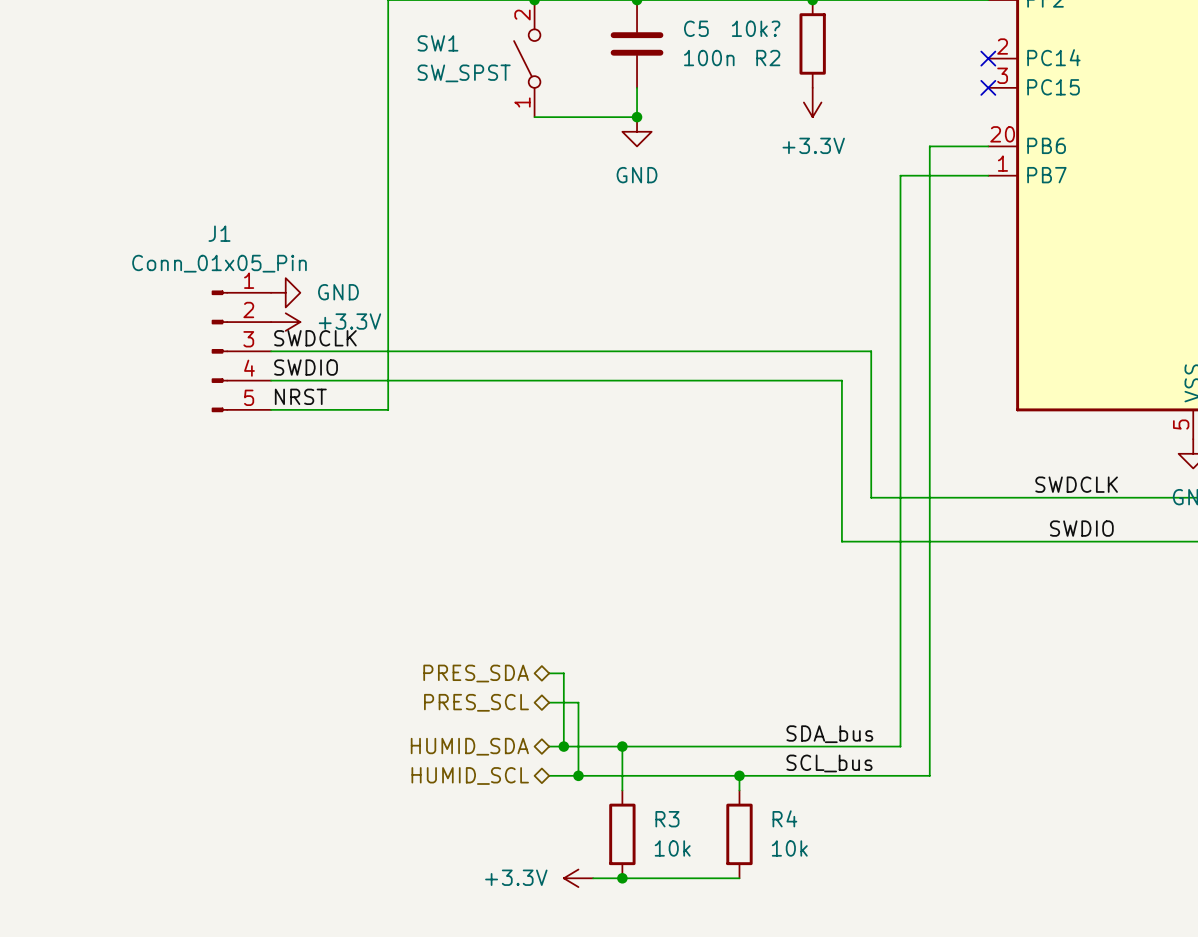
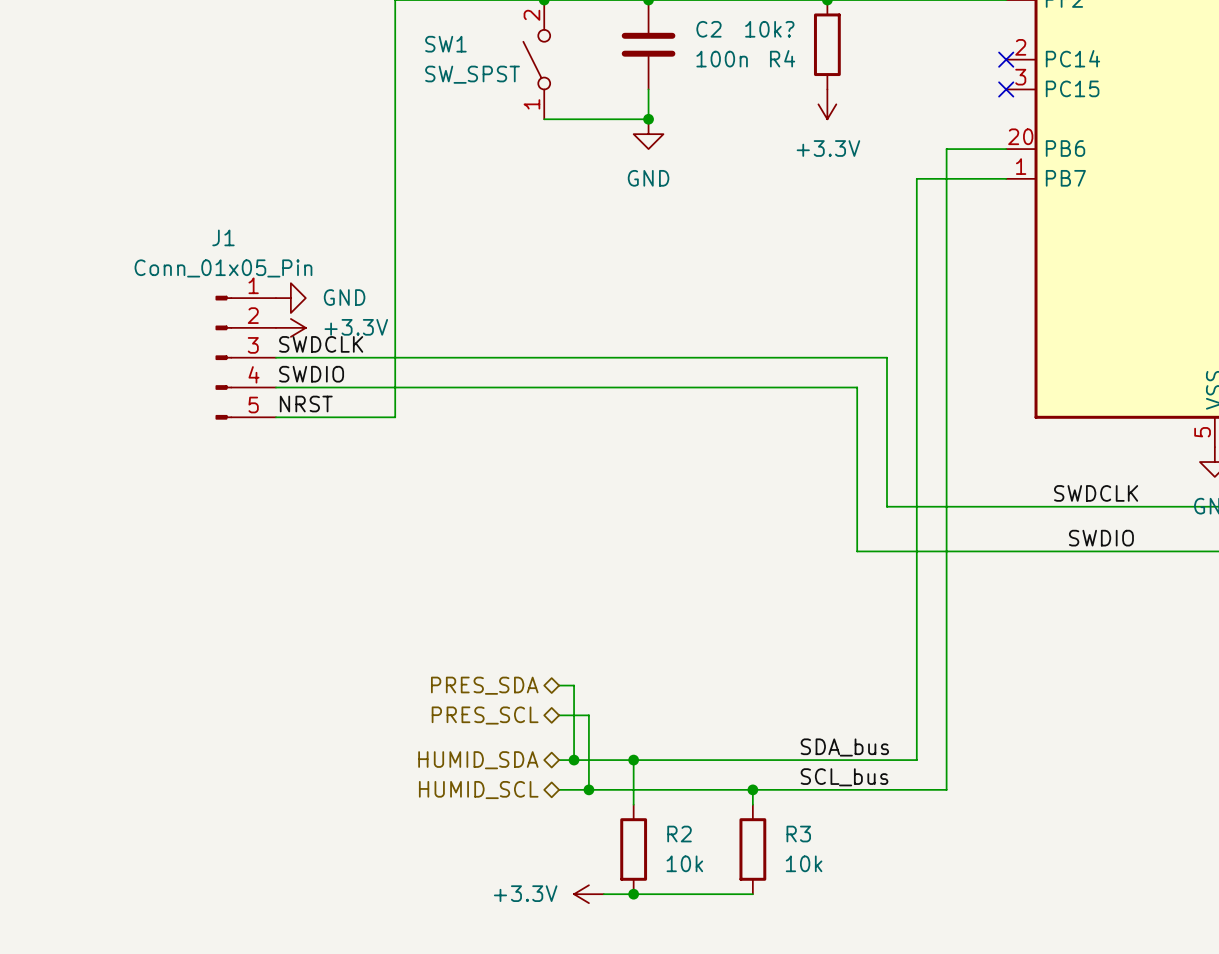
C5 name: C5 (696, 28) -> C2 (708, 29)
R2 name: R2 (768, 58) -> R4 (782, 58)
R4 name: R4 (784, 818) -> R3 (798, 834)
R3 name: R3 (667, 819) -> R2 (679, 834)

